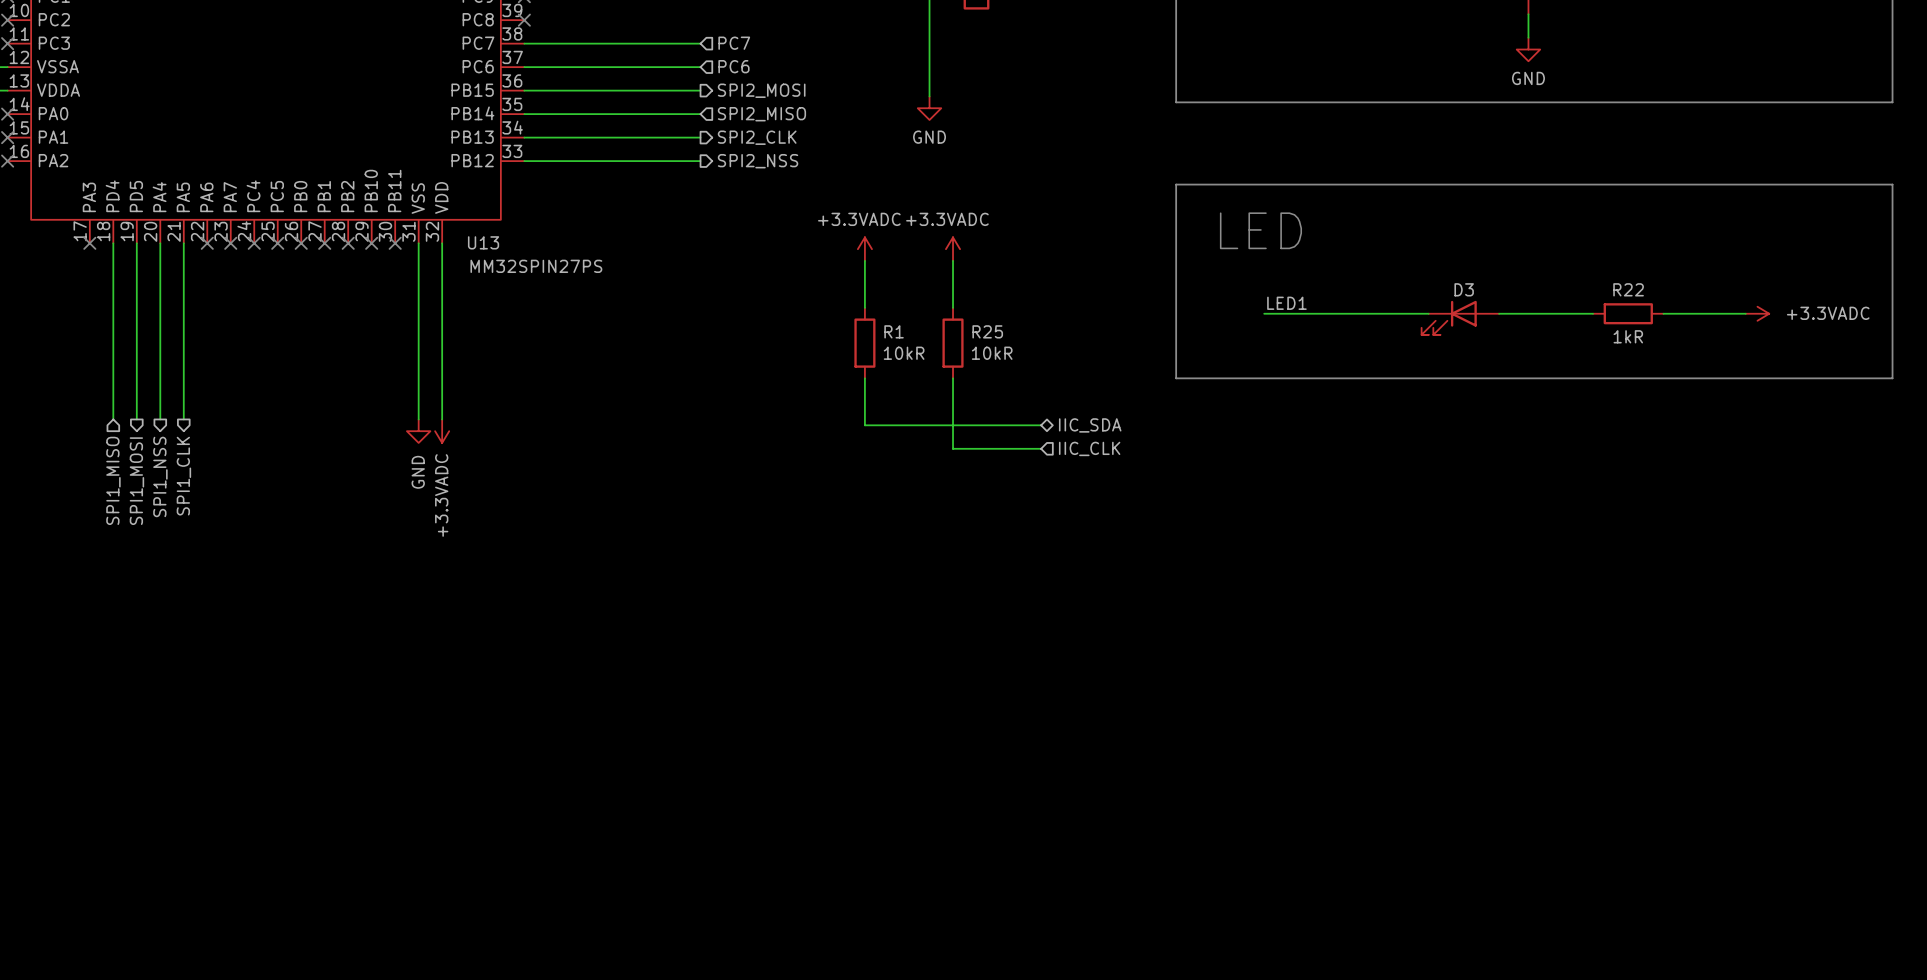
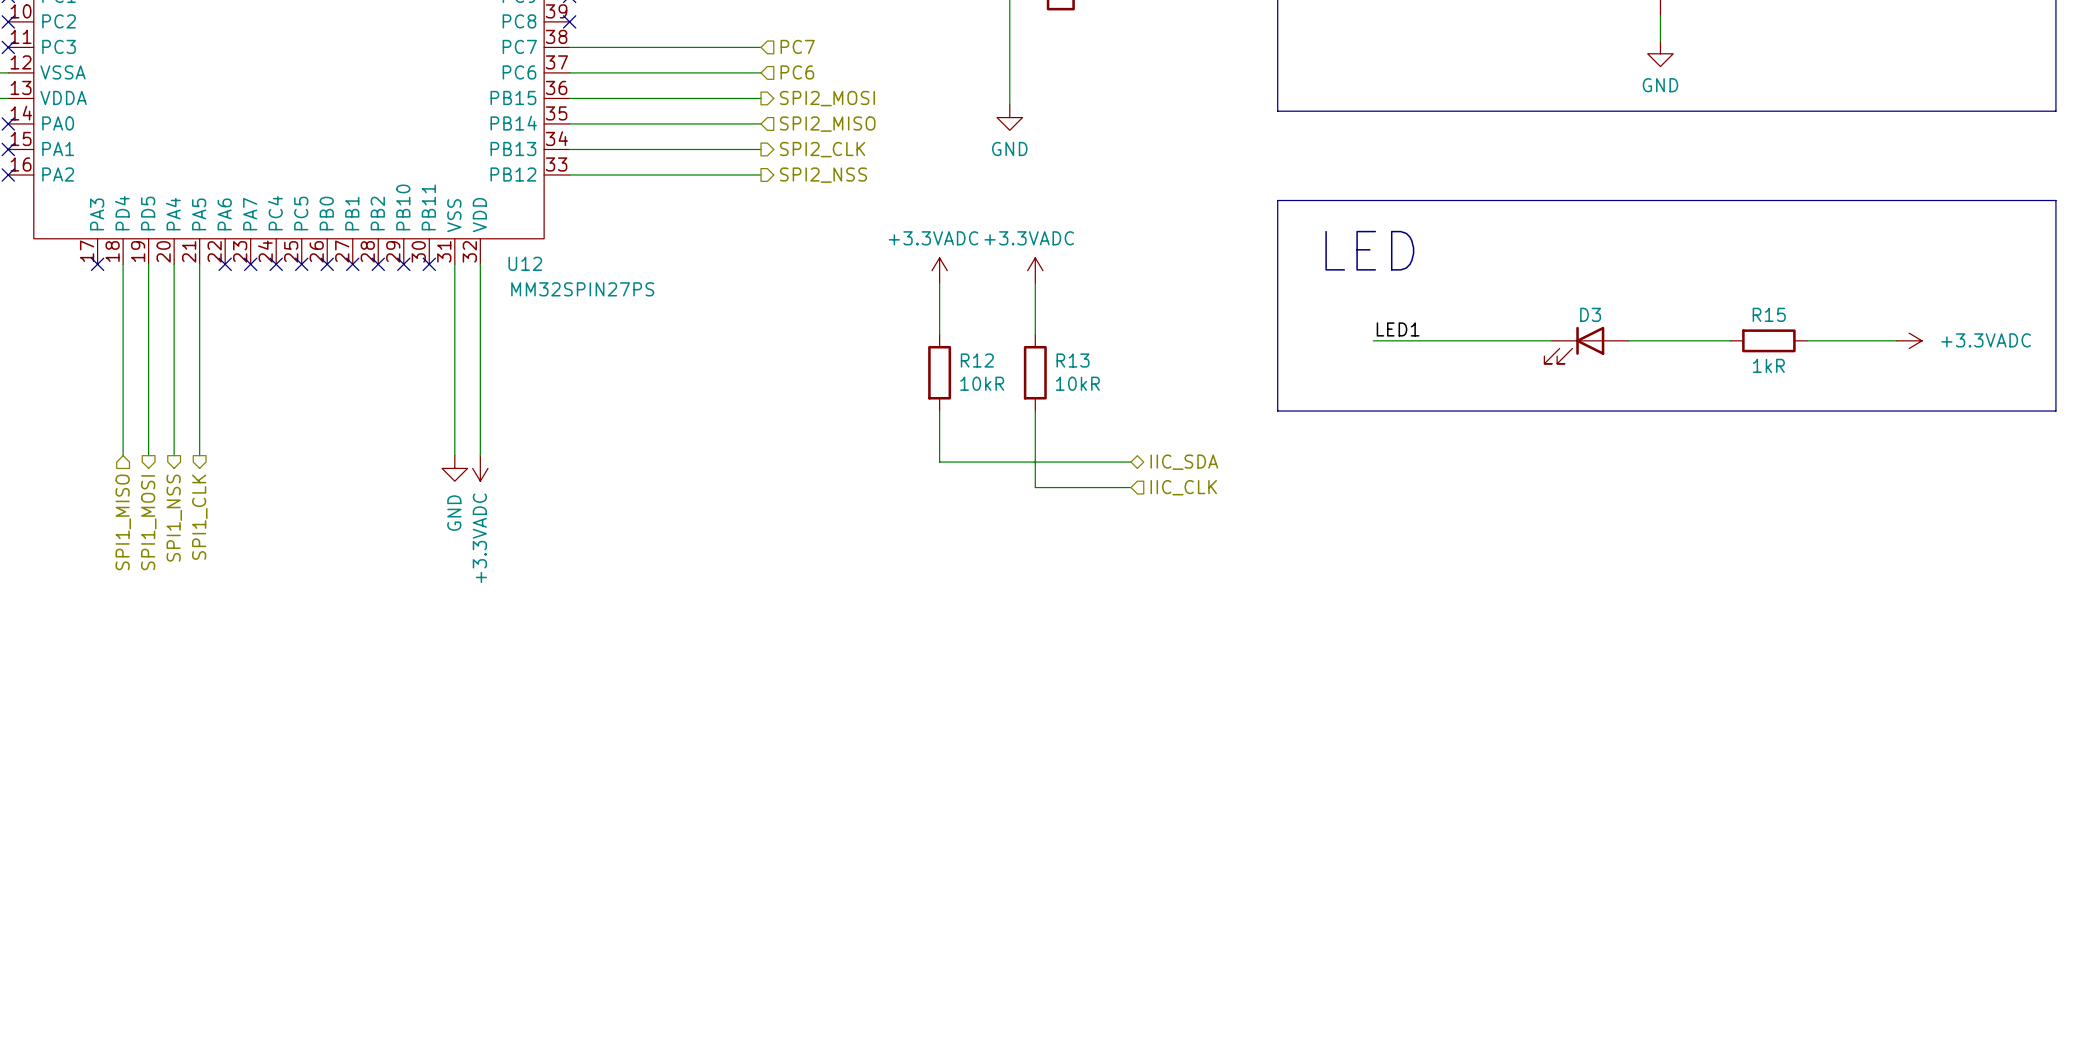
U13 name: U13 (483, 242) -> U12 (525, 263)
R22 name: R22 (1628, 289) -> R15 (1769, 314)
R1 name: R1 (894, 331) -> R12 (977, 360)
R25 name: R25 (987, 331) -> R13 (1073, 360)

